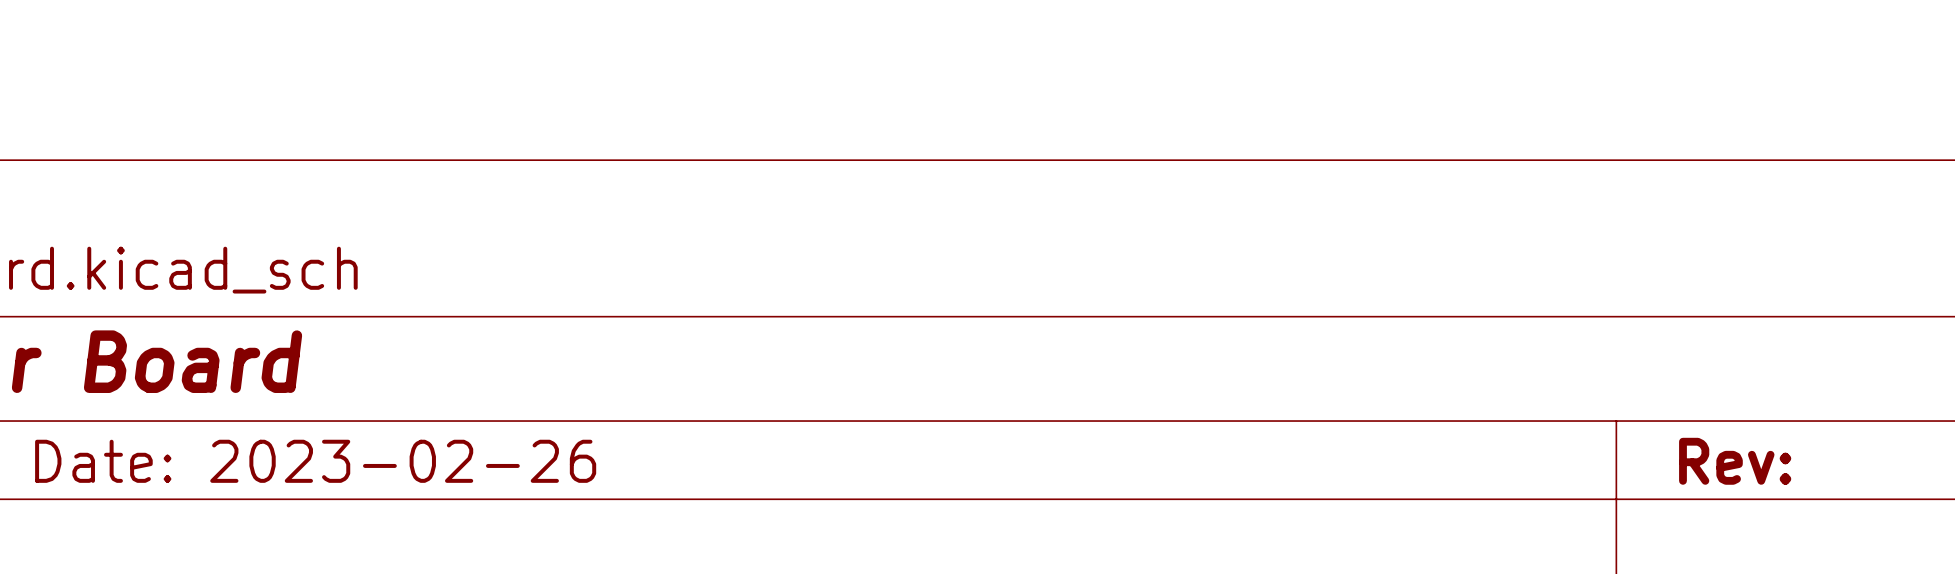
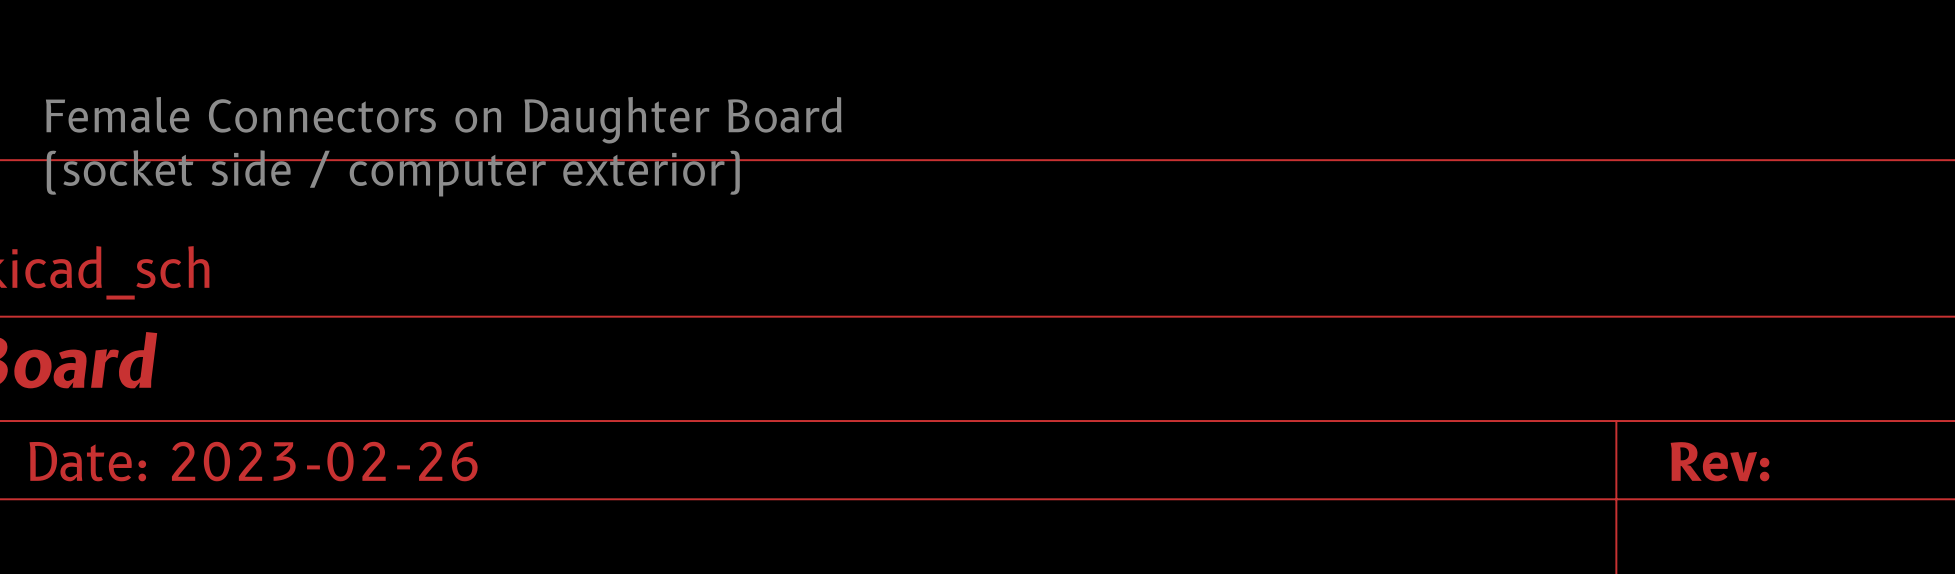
text: none -> Female Connectors on Daughter Board (443, 120)
text: none -> (socket side / computer exterior) (393, 173)

